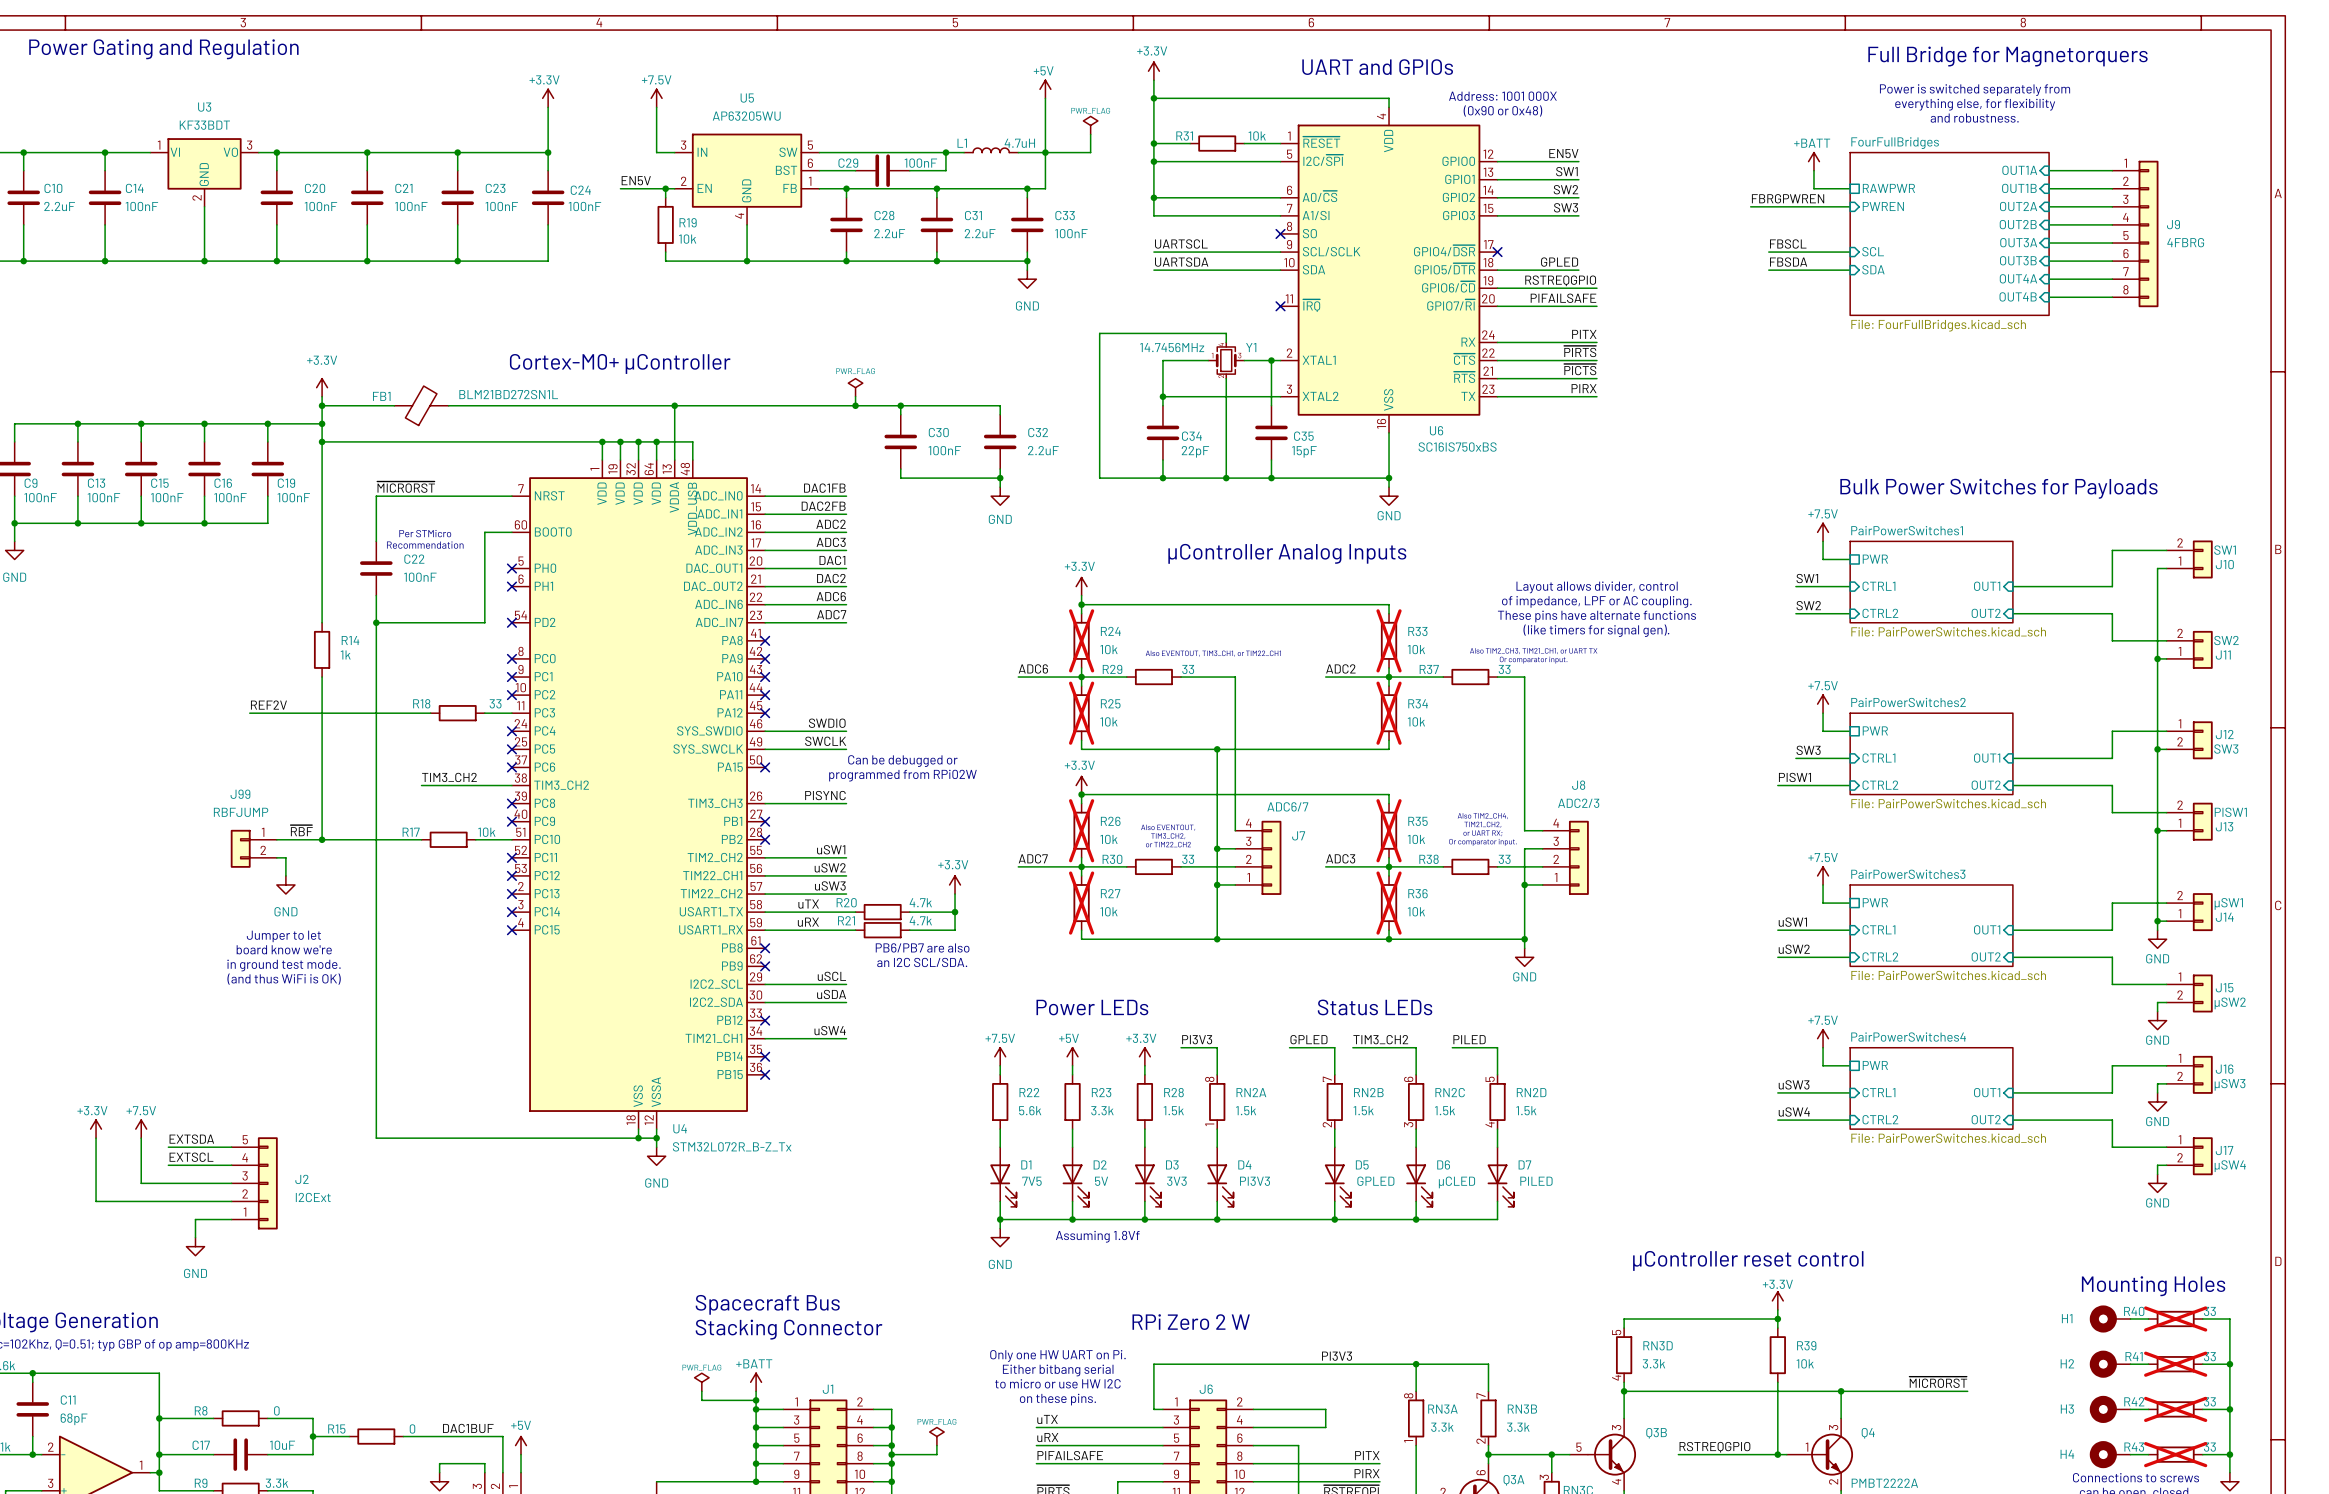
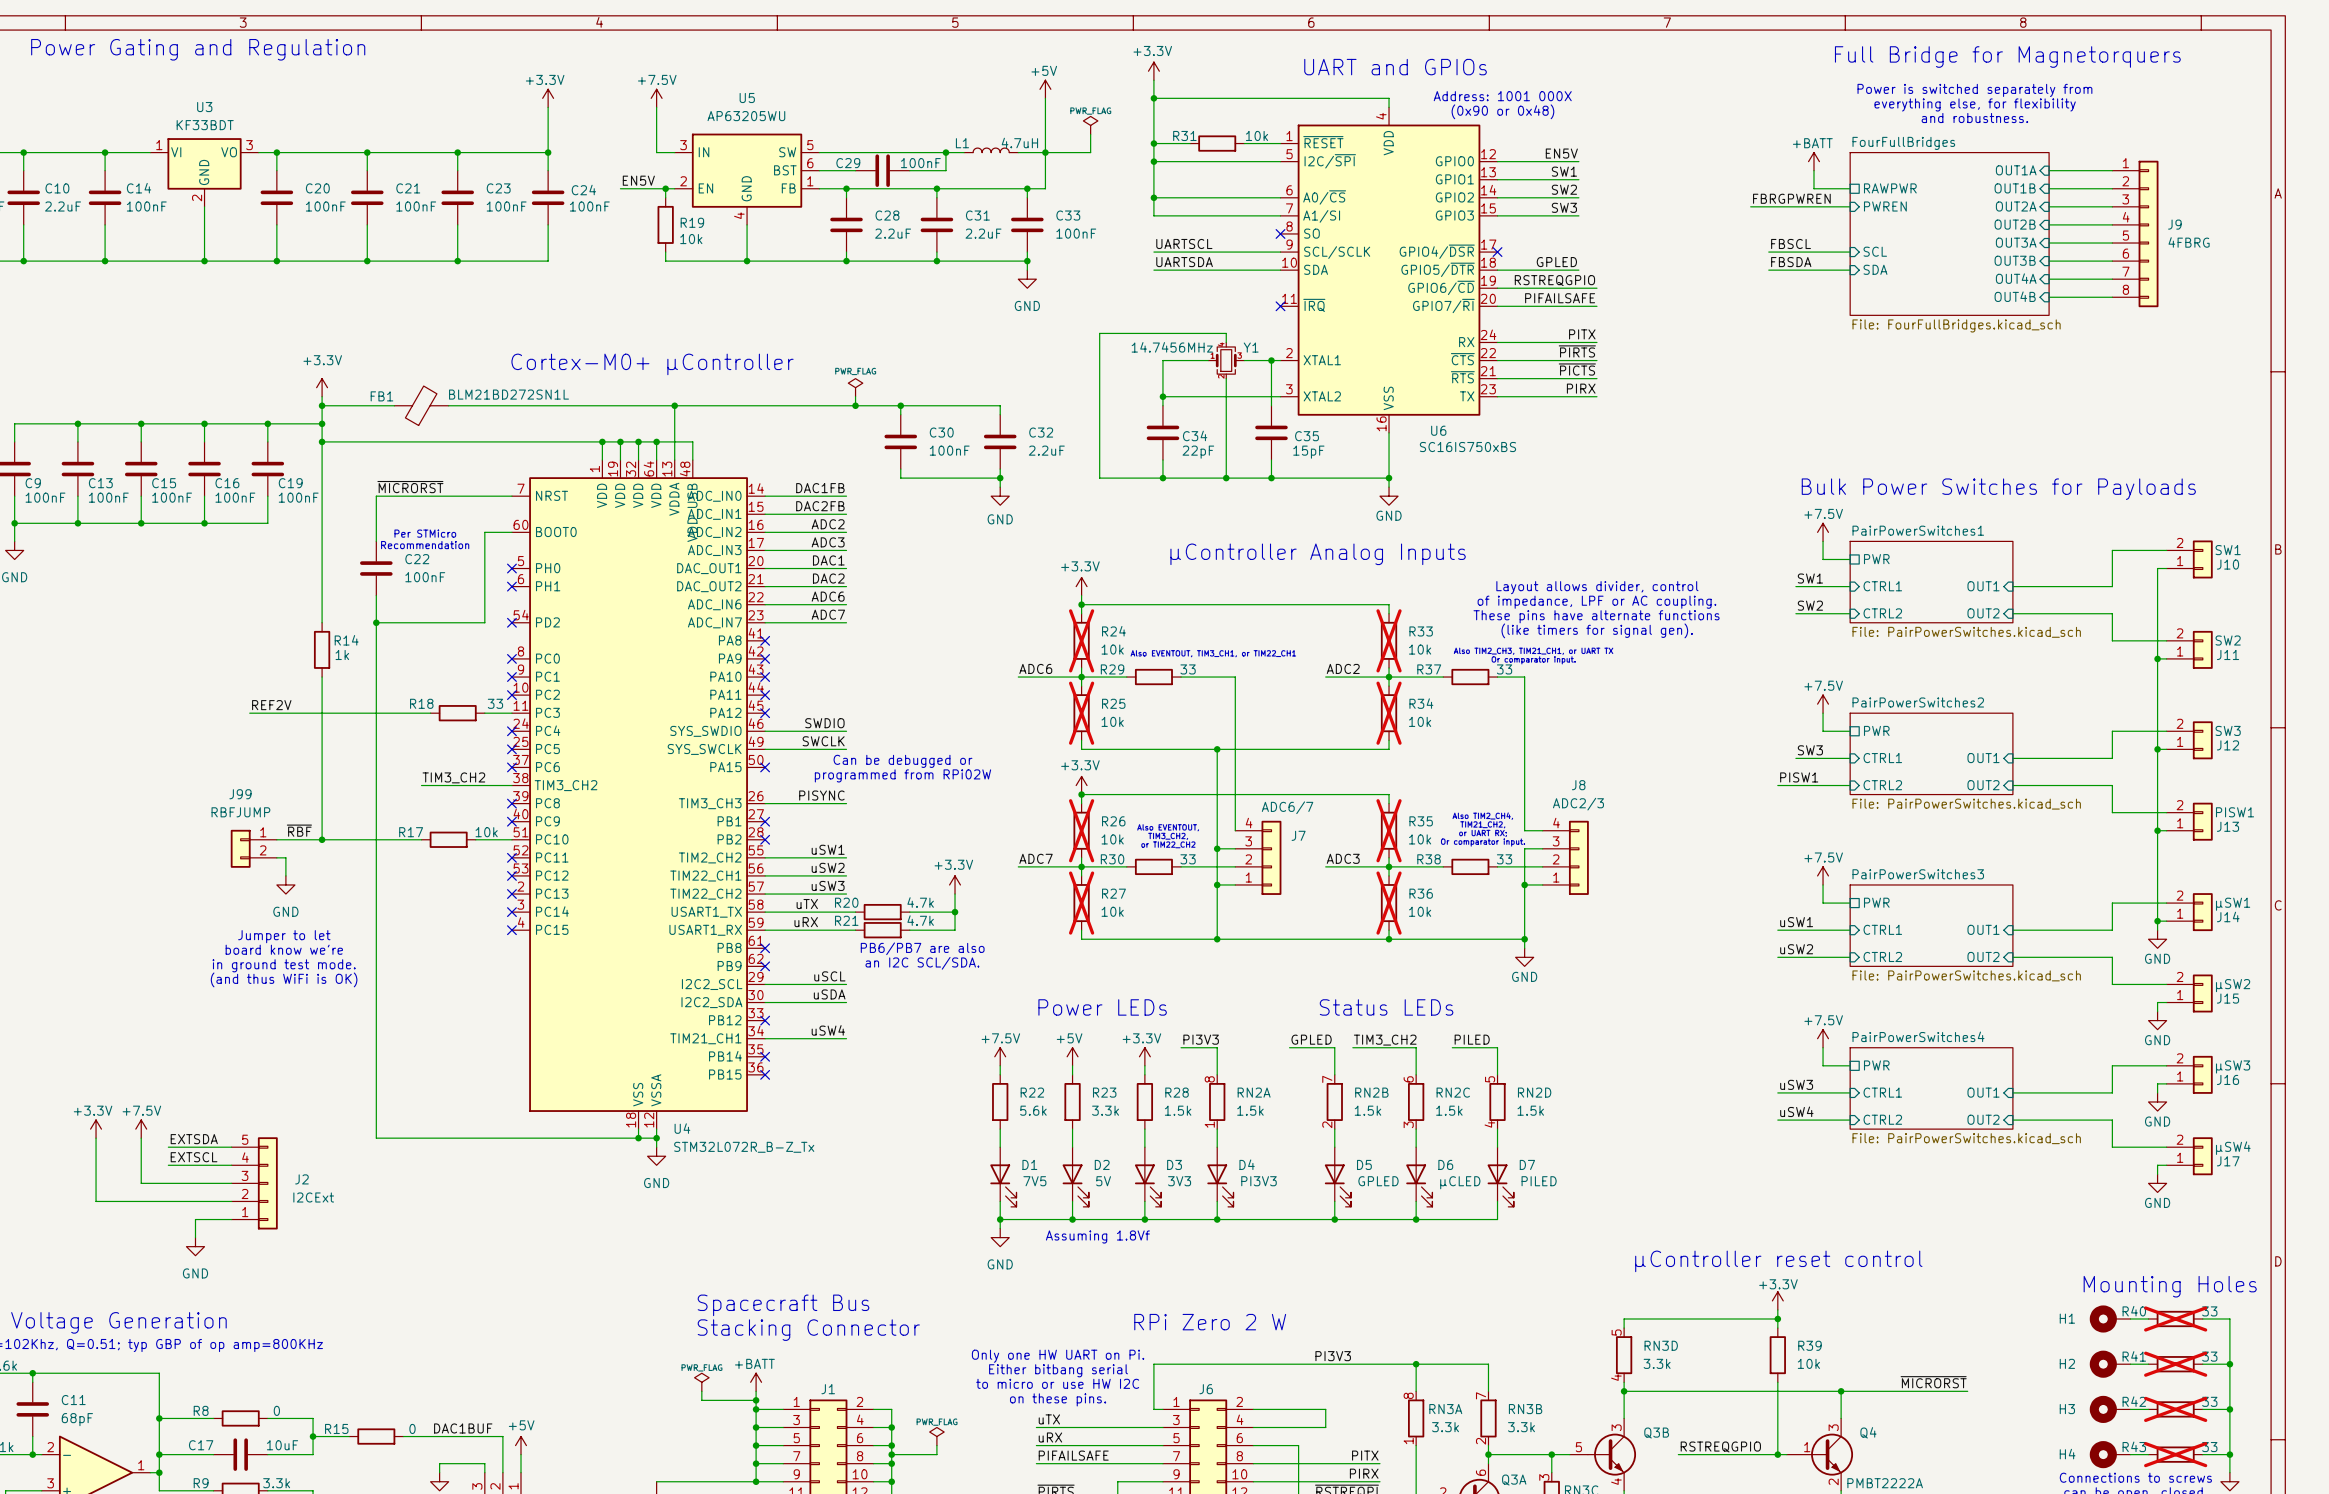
J12 flip: as is (2202, 740) -> up-down (2202, 740)
J15 flip: as is (2202, 993) -> up-down (2202, 993)
J16 flip: as is (2202, 1074) -> up-down (2202, 1074)
J17 flip: as is (2202, 1156) -> up-down (2202, 1156)

